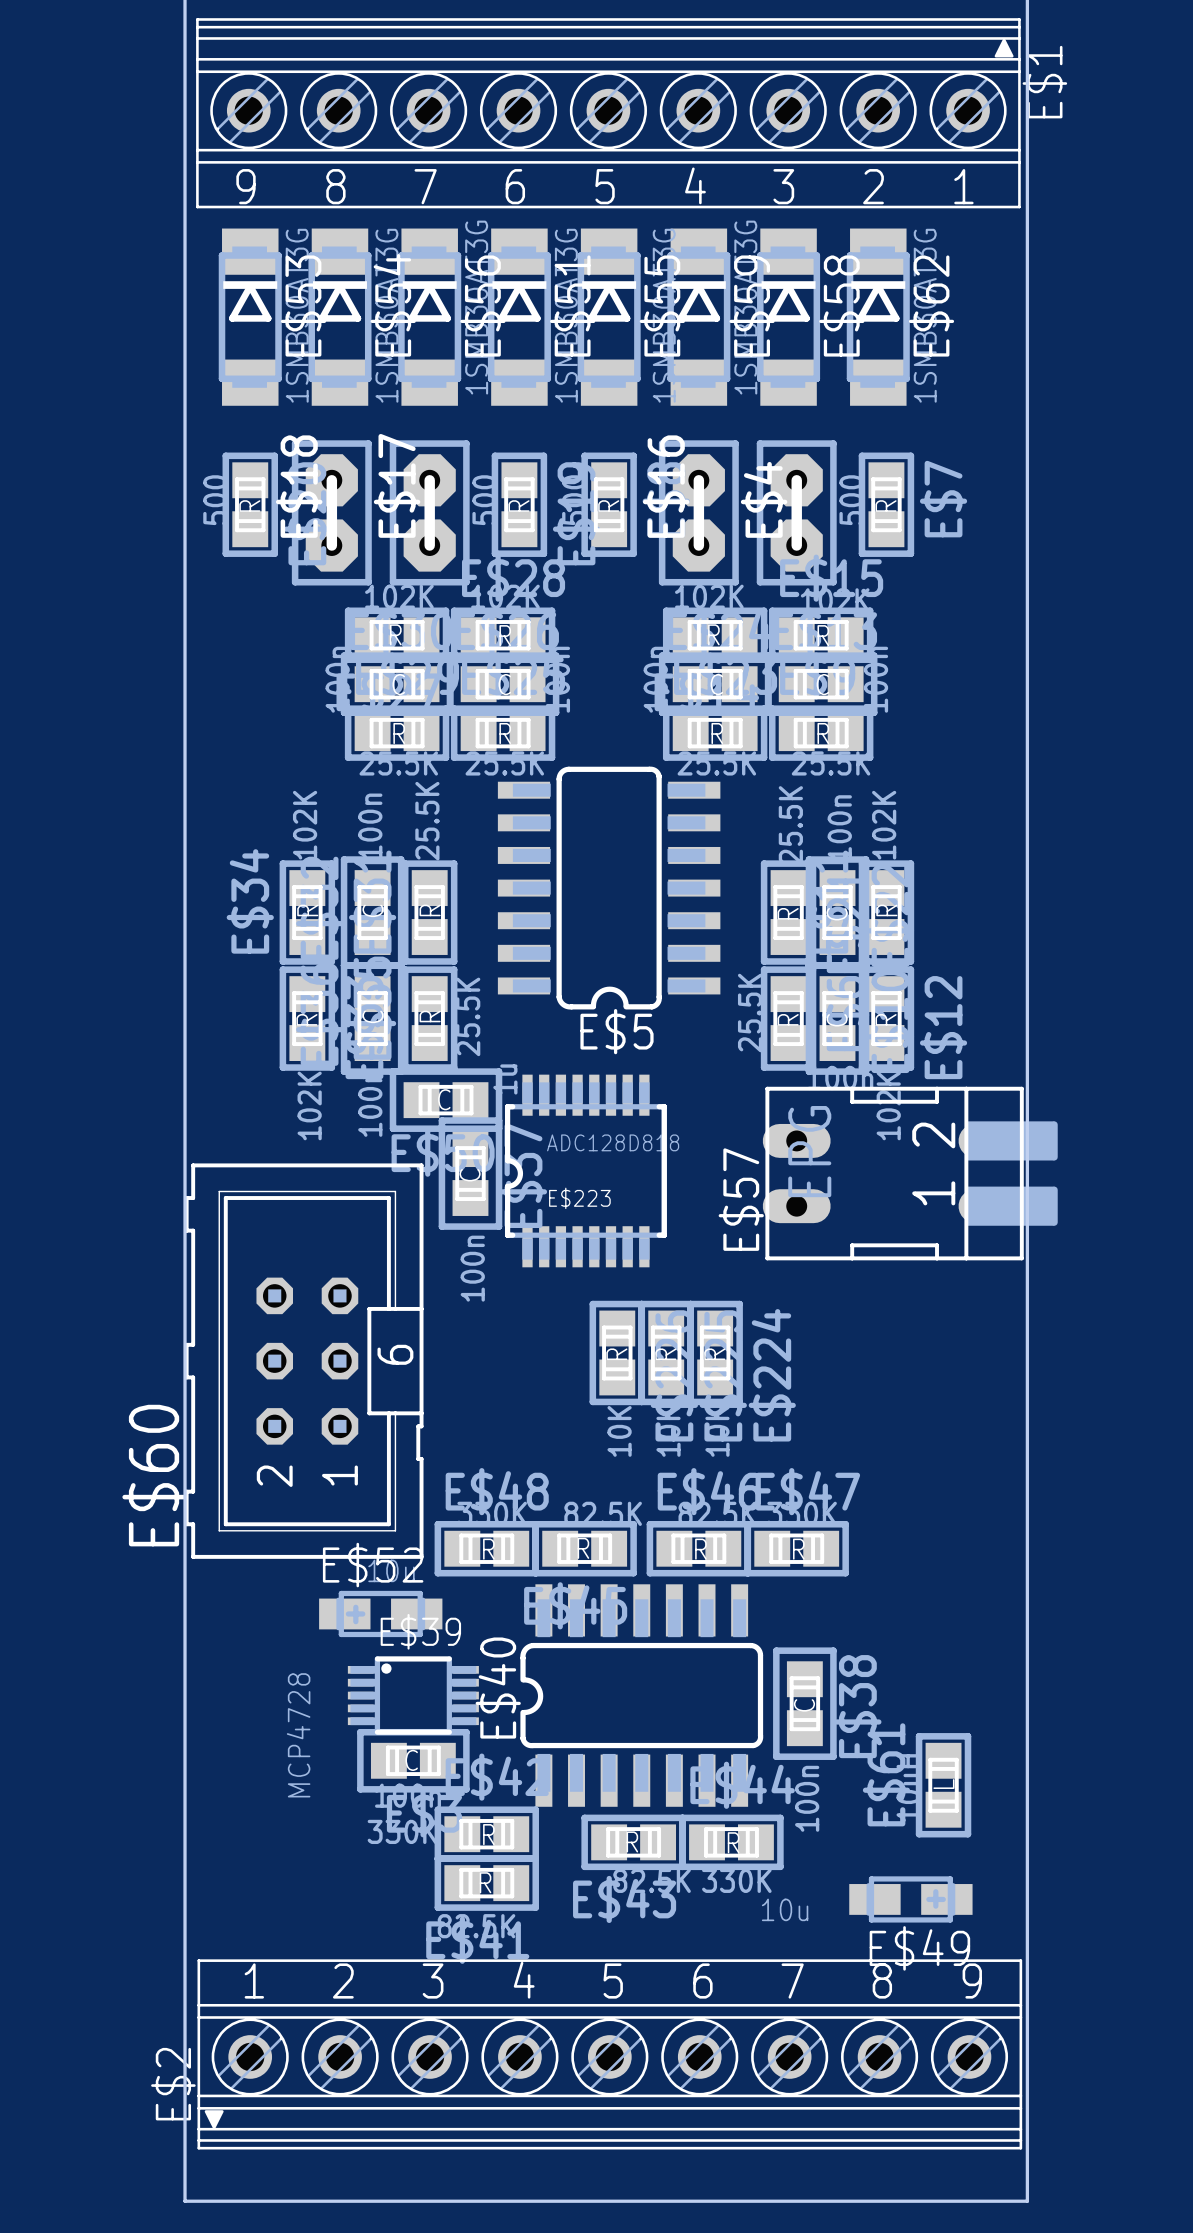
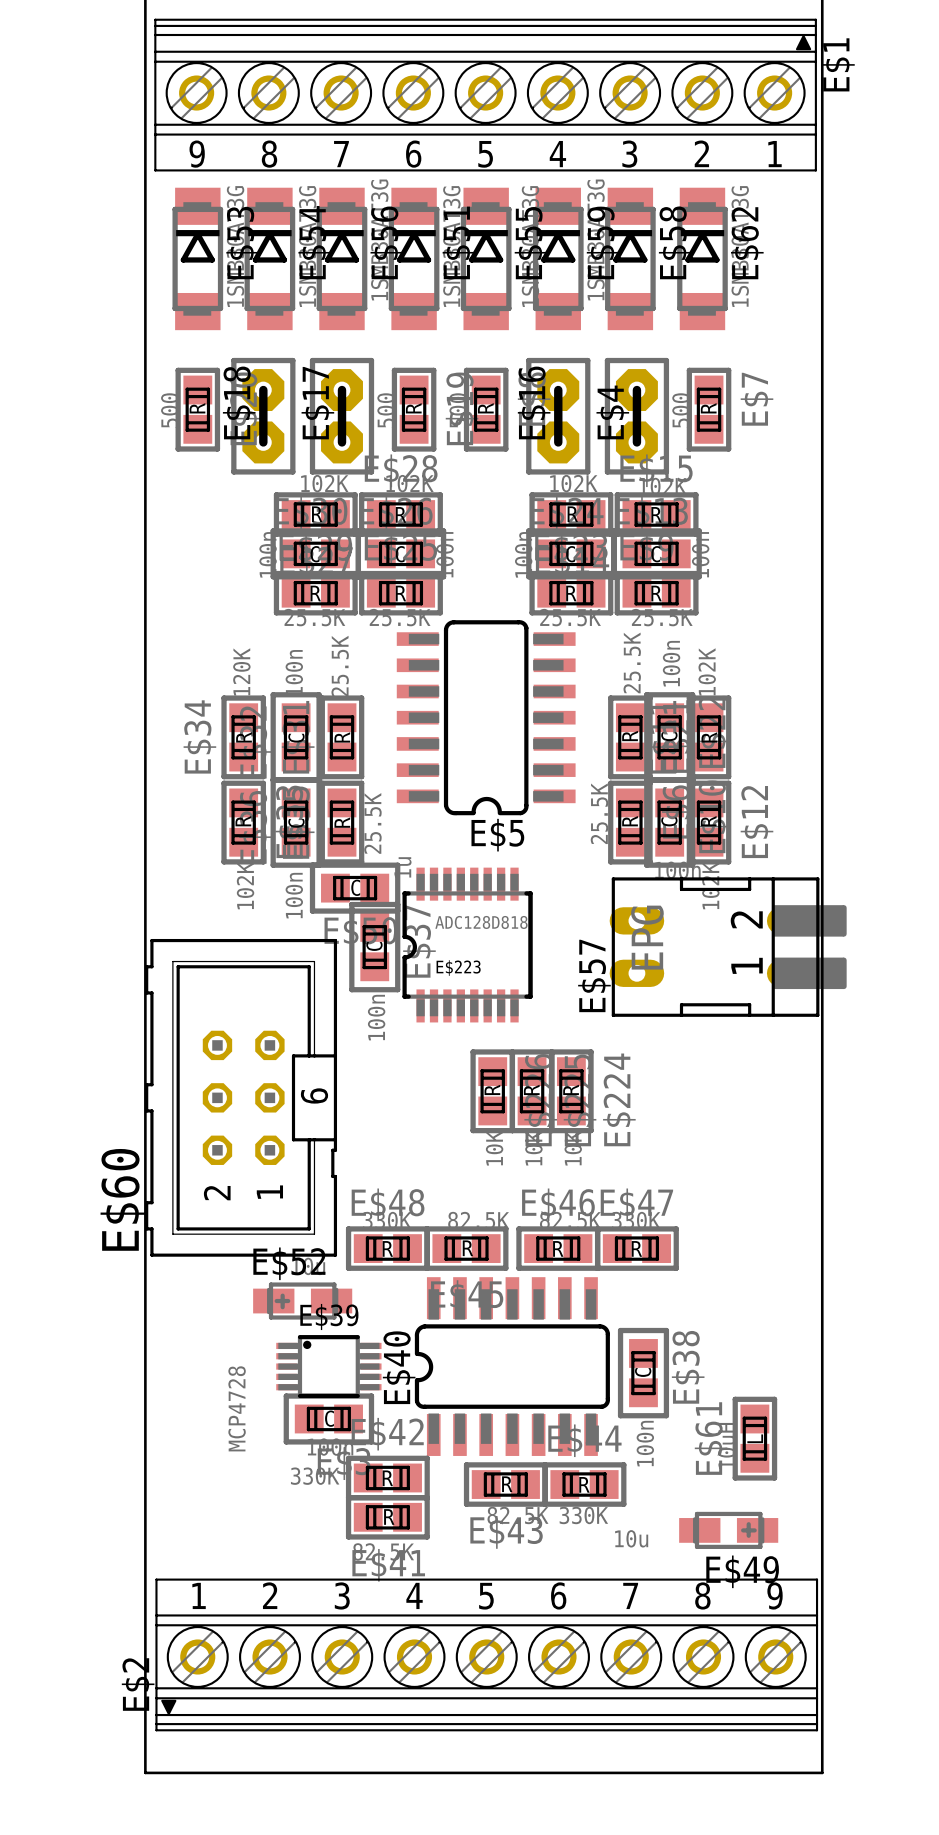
E$34 value: 102K (305, 825) -> 120K (241, 671)

